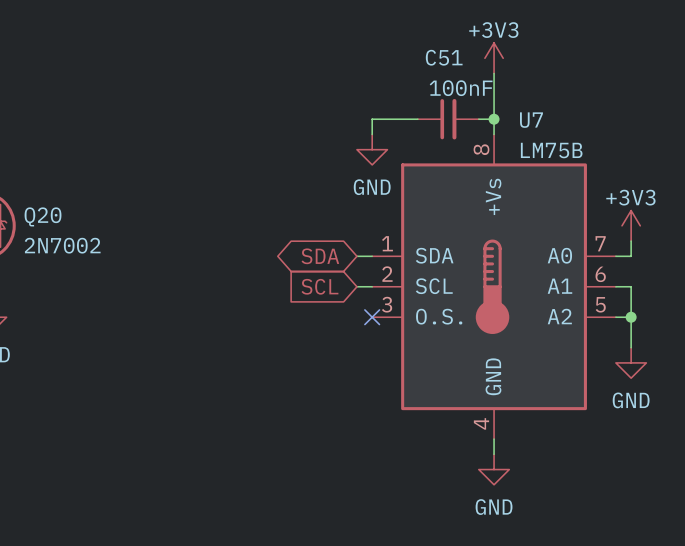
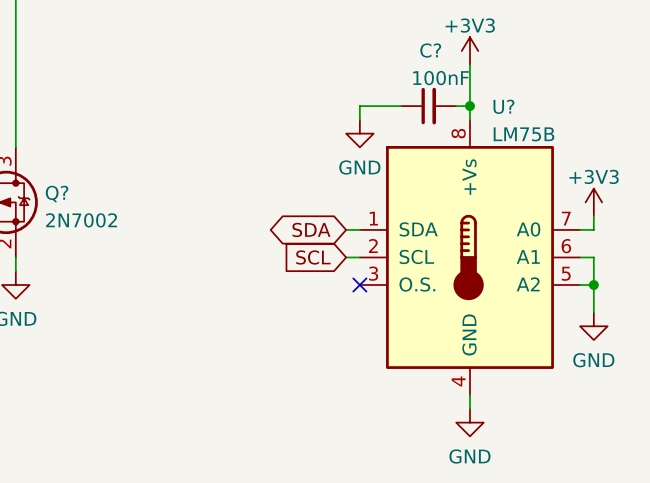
C51 name: C51 (444, 57) -> C? (430, 50)
U7 name: U7 (531, 120) -> U? (503, 106)
Q20 name: Q20 (43, 216) -> Q? (57, 193)

